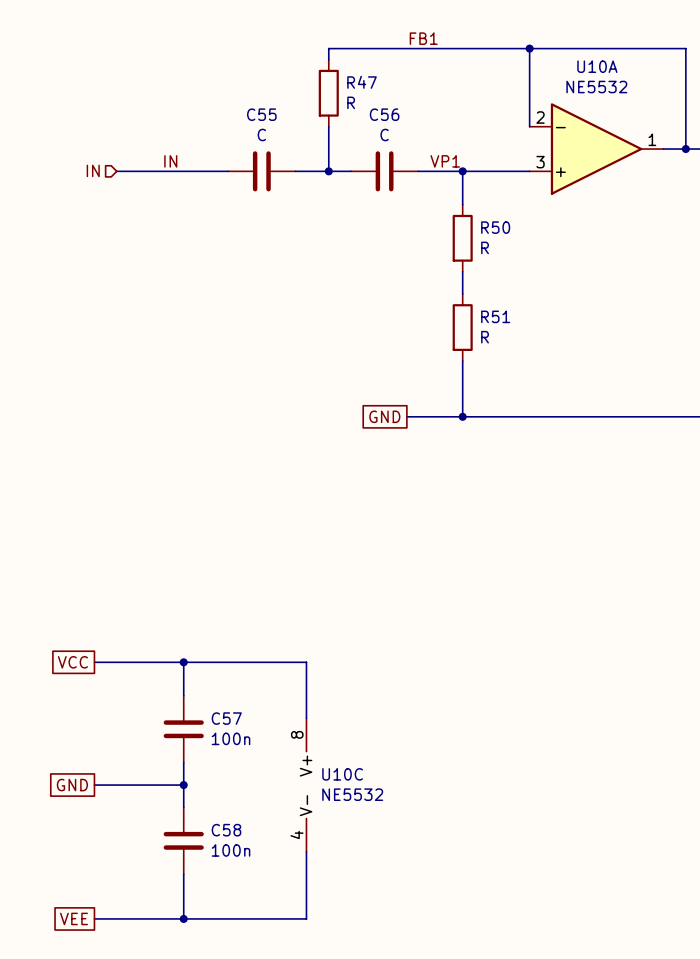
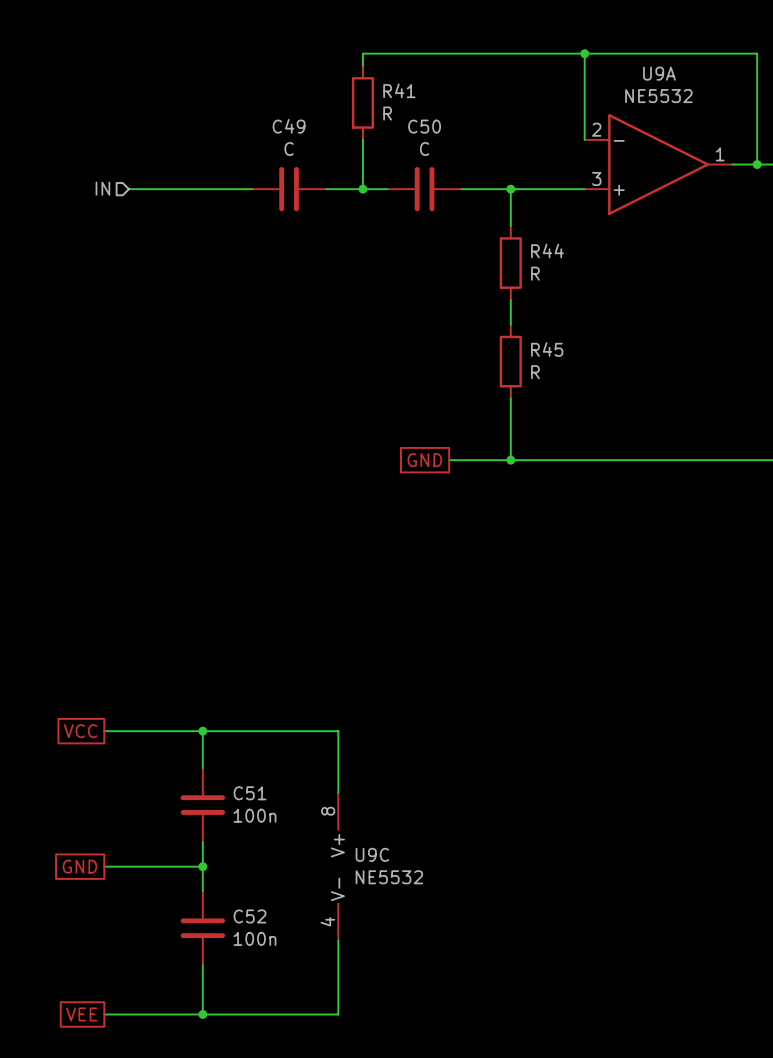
label: FB1 (423, 38) -> none
U10A name: U10A (597, 66) -> U9A (659, 73)
R47 name: R47 (362, 82) -> R41 (399, 90)
C55 name: C55 (261, 114) -> C49 (289, 126)
C56 name: C56 (384, 114) -> C50 (424, 126)
label: IN (170, 161) -> none
label: VP1 (445, 161) -> none
R50 name: R50 (495, 227) -> R44 (547, 250)
R51 name: R51 (495, 316) -> R45 (547, 349)
C57 name: C57 (226, 718) -> C51 (250, 793)
U10C name: U10C (342, 774) -> U9C (372, 854)
C58 name: C58 (226, 830) -> C52 (250, 916)

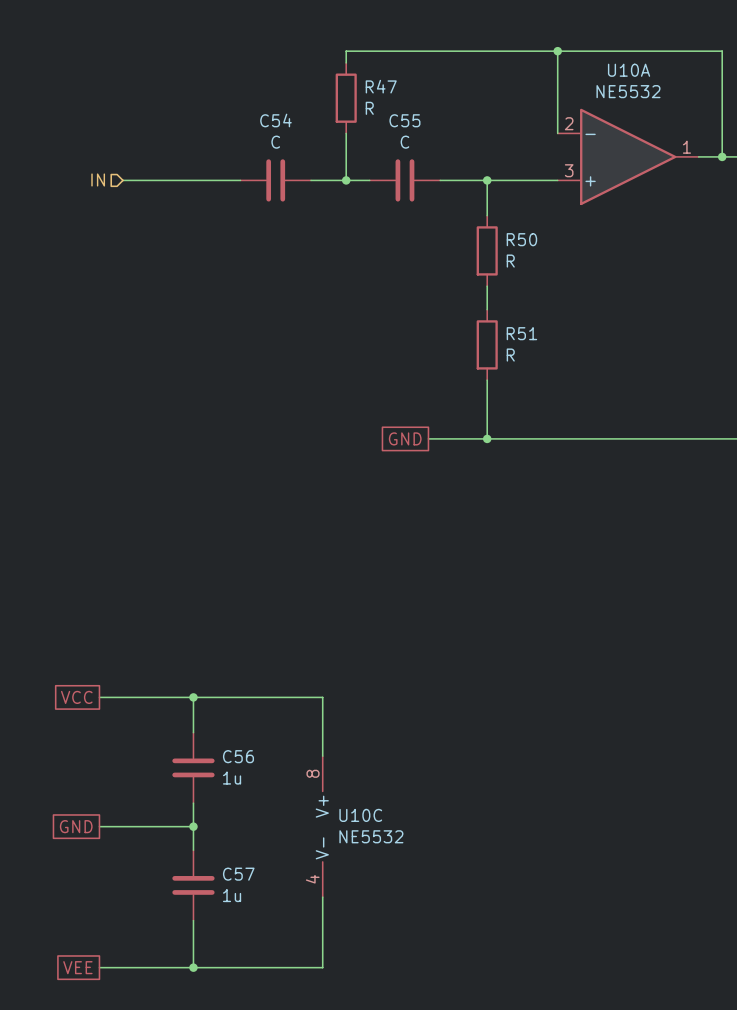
U9A name: U9A (659, 73) -> U10A (629, 70)
R41 name: R41 (399, 90) -> R47 (381, 86)
C49 name: C49 (289, 126) -> C54 (275, 120)
C50 name: C50 (424, 126) -> C55 (404, 120)
R44 name: R44 (547, 250) -> R50 (521, 239)
R45 name: R45 (547, 349) -> R51 (521, 333)
C51 name: C51 (250, 793) -> C56 (238, 756)
C51 value: 100n (255, 815) -> 1u (232, 778)
U9C name: U9C (372, 854) -> U10C (360, 815)
C52 name: C52 (250, 916) -> C57 (238, 874)
C52 value: 100n (255, 938) -> 1u (232, 895)

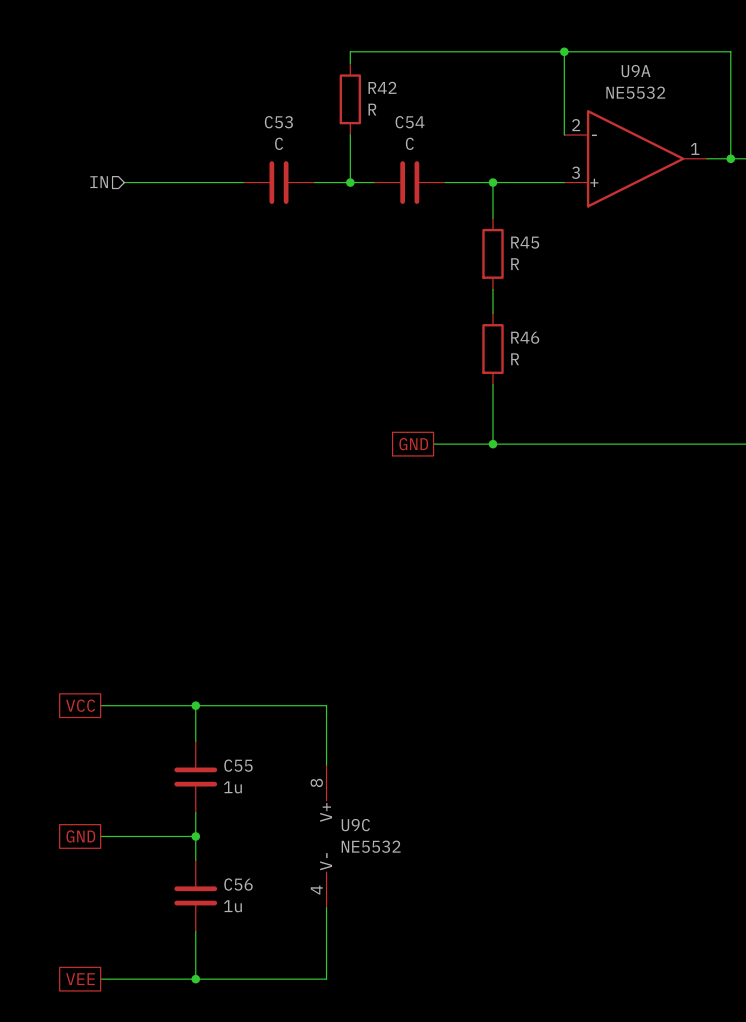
U10A name: U10A (629, 70) -> U9A (636, 71)
R47 name: R47 (381, 86) -> R42 (382, 87)
C54 name: C54 (275, 120) -> C53 (278, 122)
C55 name: C55 (404, 120) -> C54 (410, 122)
R50 name: R50 (521, 239) -> R45 (525, 242)
R51 name: R51 (521, 333) -> R46 (525, 337)
C56 name: C56 (238, 756) -> C55 (238, 765)
U10C name: U10C (360, 815) -> U9C (355, 825)
C57 name: C57 (238, 874) -> C56 (238, 884)

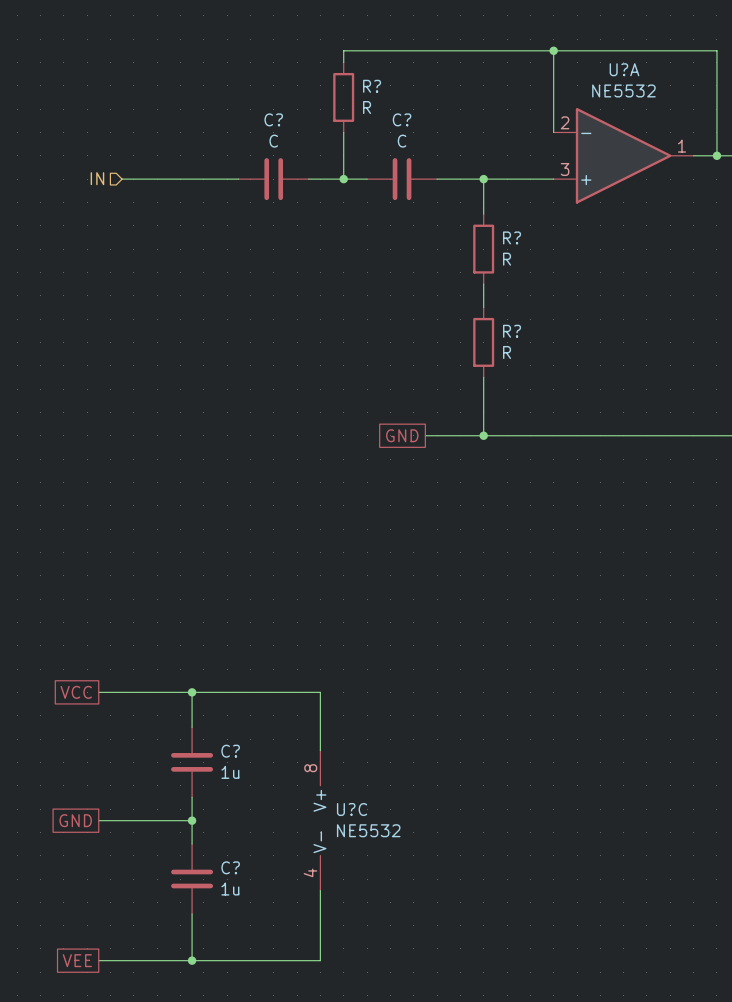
U9A name: U9A (636, 71) -> U?A (624, 69)
R42 name: R42 (382, 87) -> R? (372, 86)
C53 name: C53 (278, 122) -> C? (273, 119)
C54 name: C54 (410, 122) -> C? (402, 119)
R45 name: R45 (525, 242) -> R? (512, 237)
R46 name: R46 (525, 337) -> R? (512, 331)
C55 name: C55 (238, 765) -> C? (230, 751)
U9C name: U9C (355, 825) -> U?C (352, 809)
C56 name: C56 (238, 884) -> C? (230, 867)

